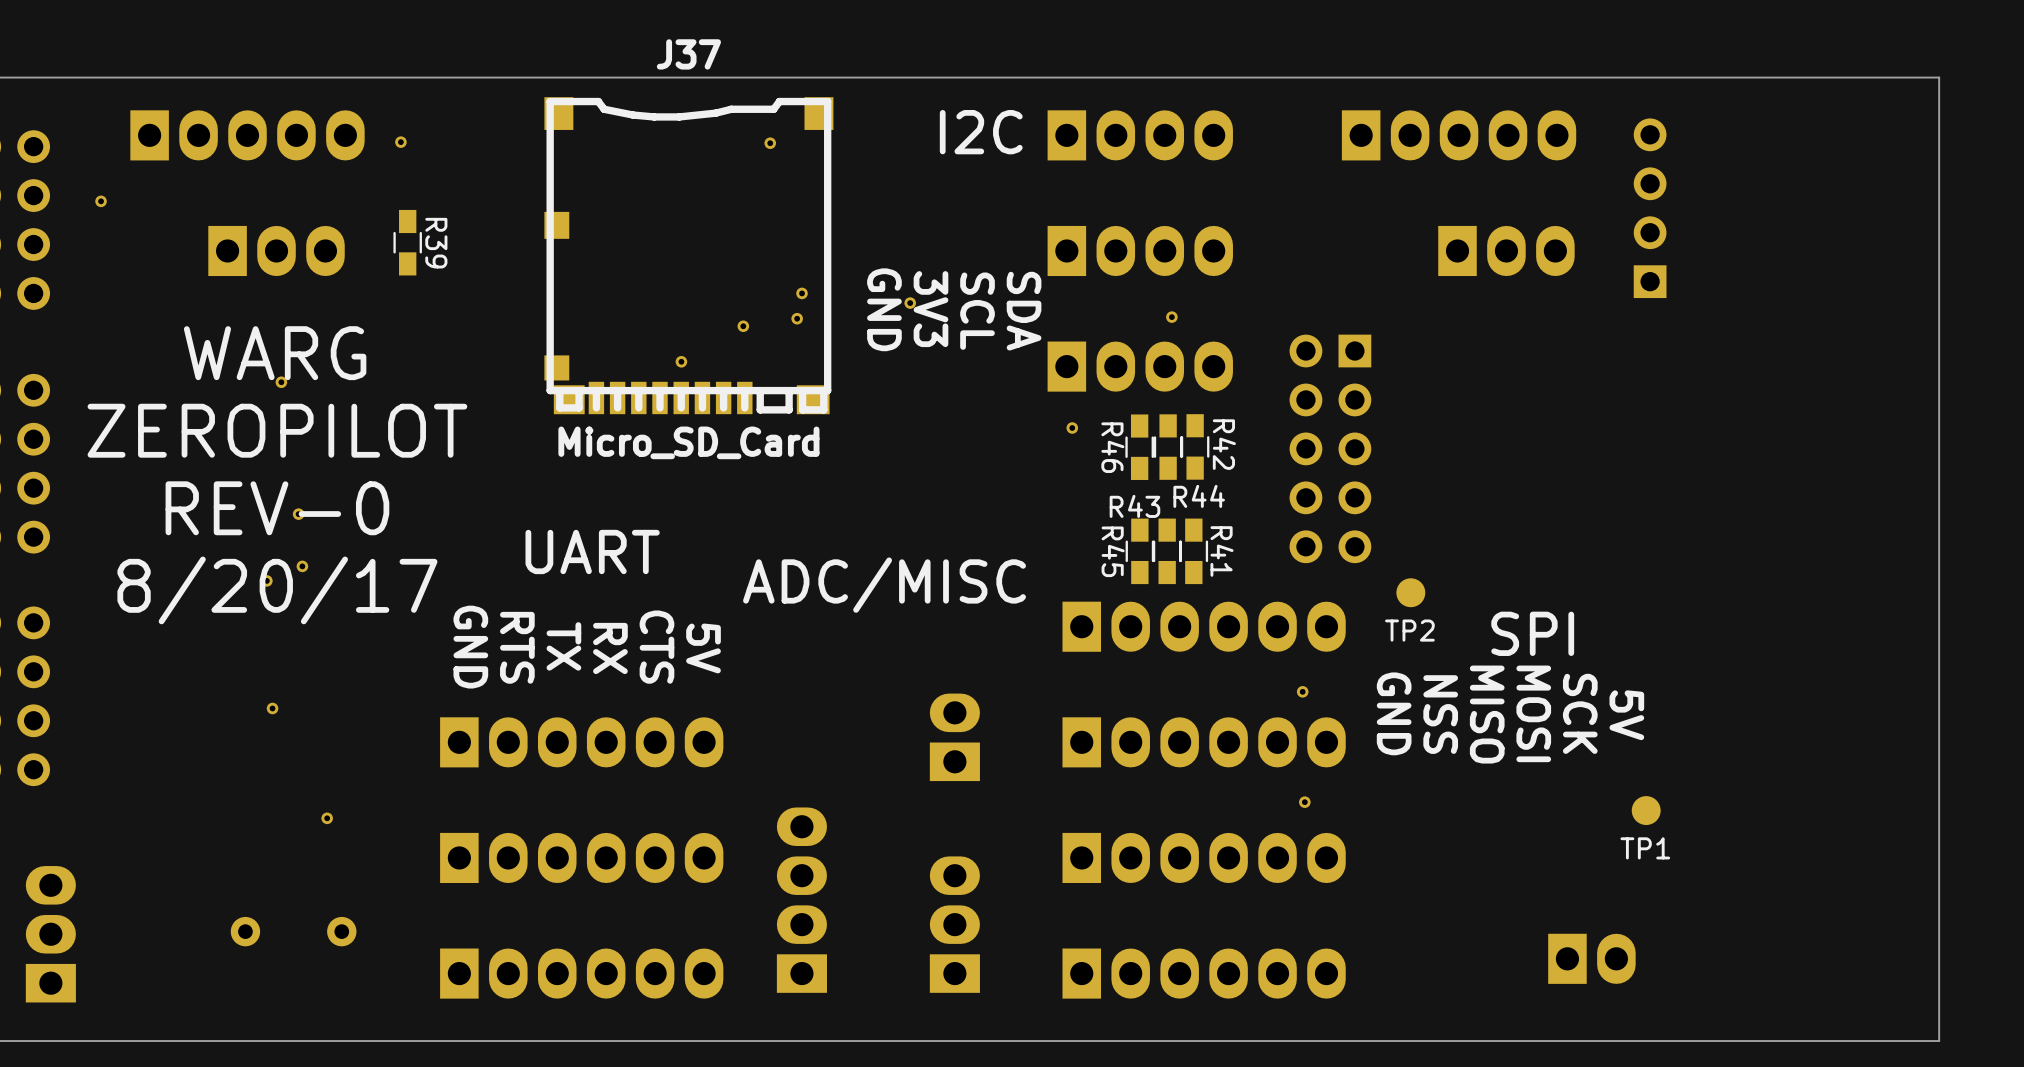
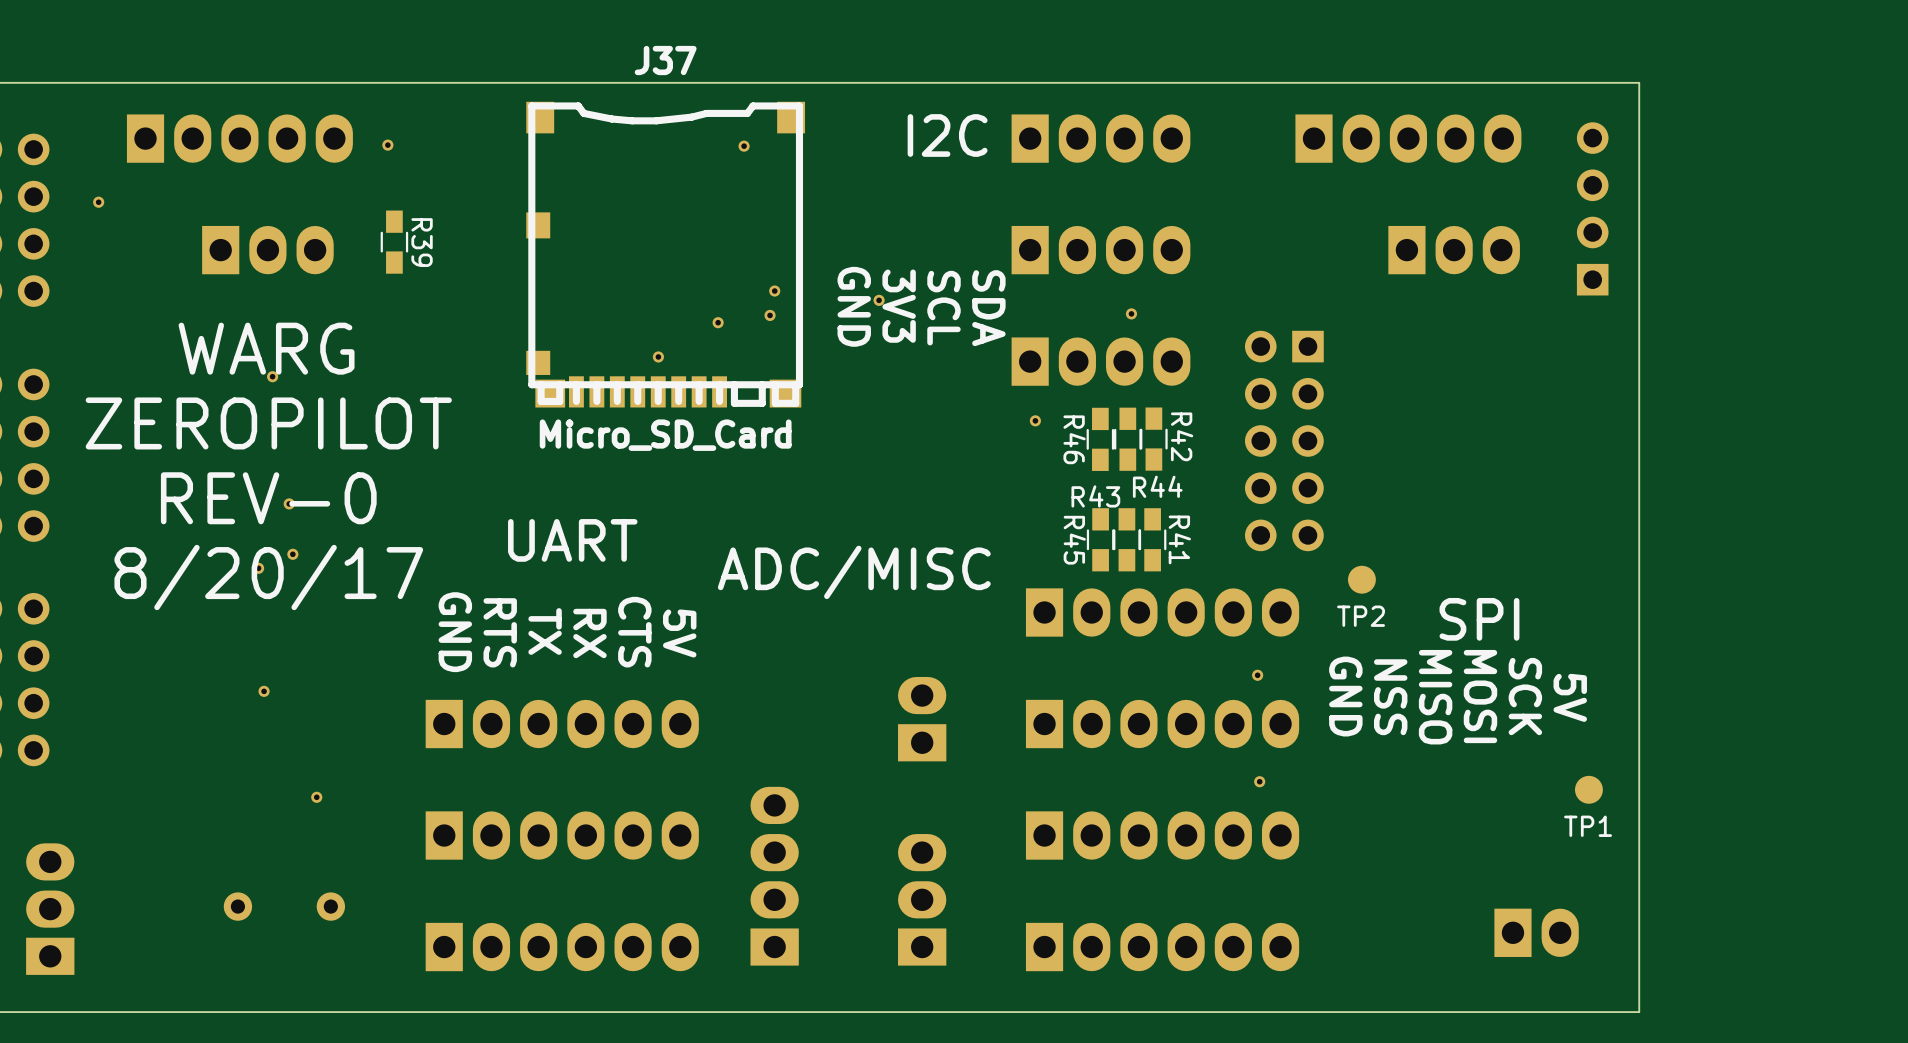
board edge: (1698, 77) (1939, 77) (1939, 1041) (1698, 1041) -> (1639, 82) (1639, 1012)

